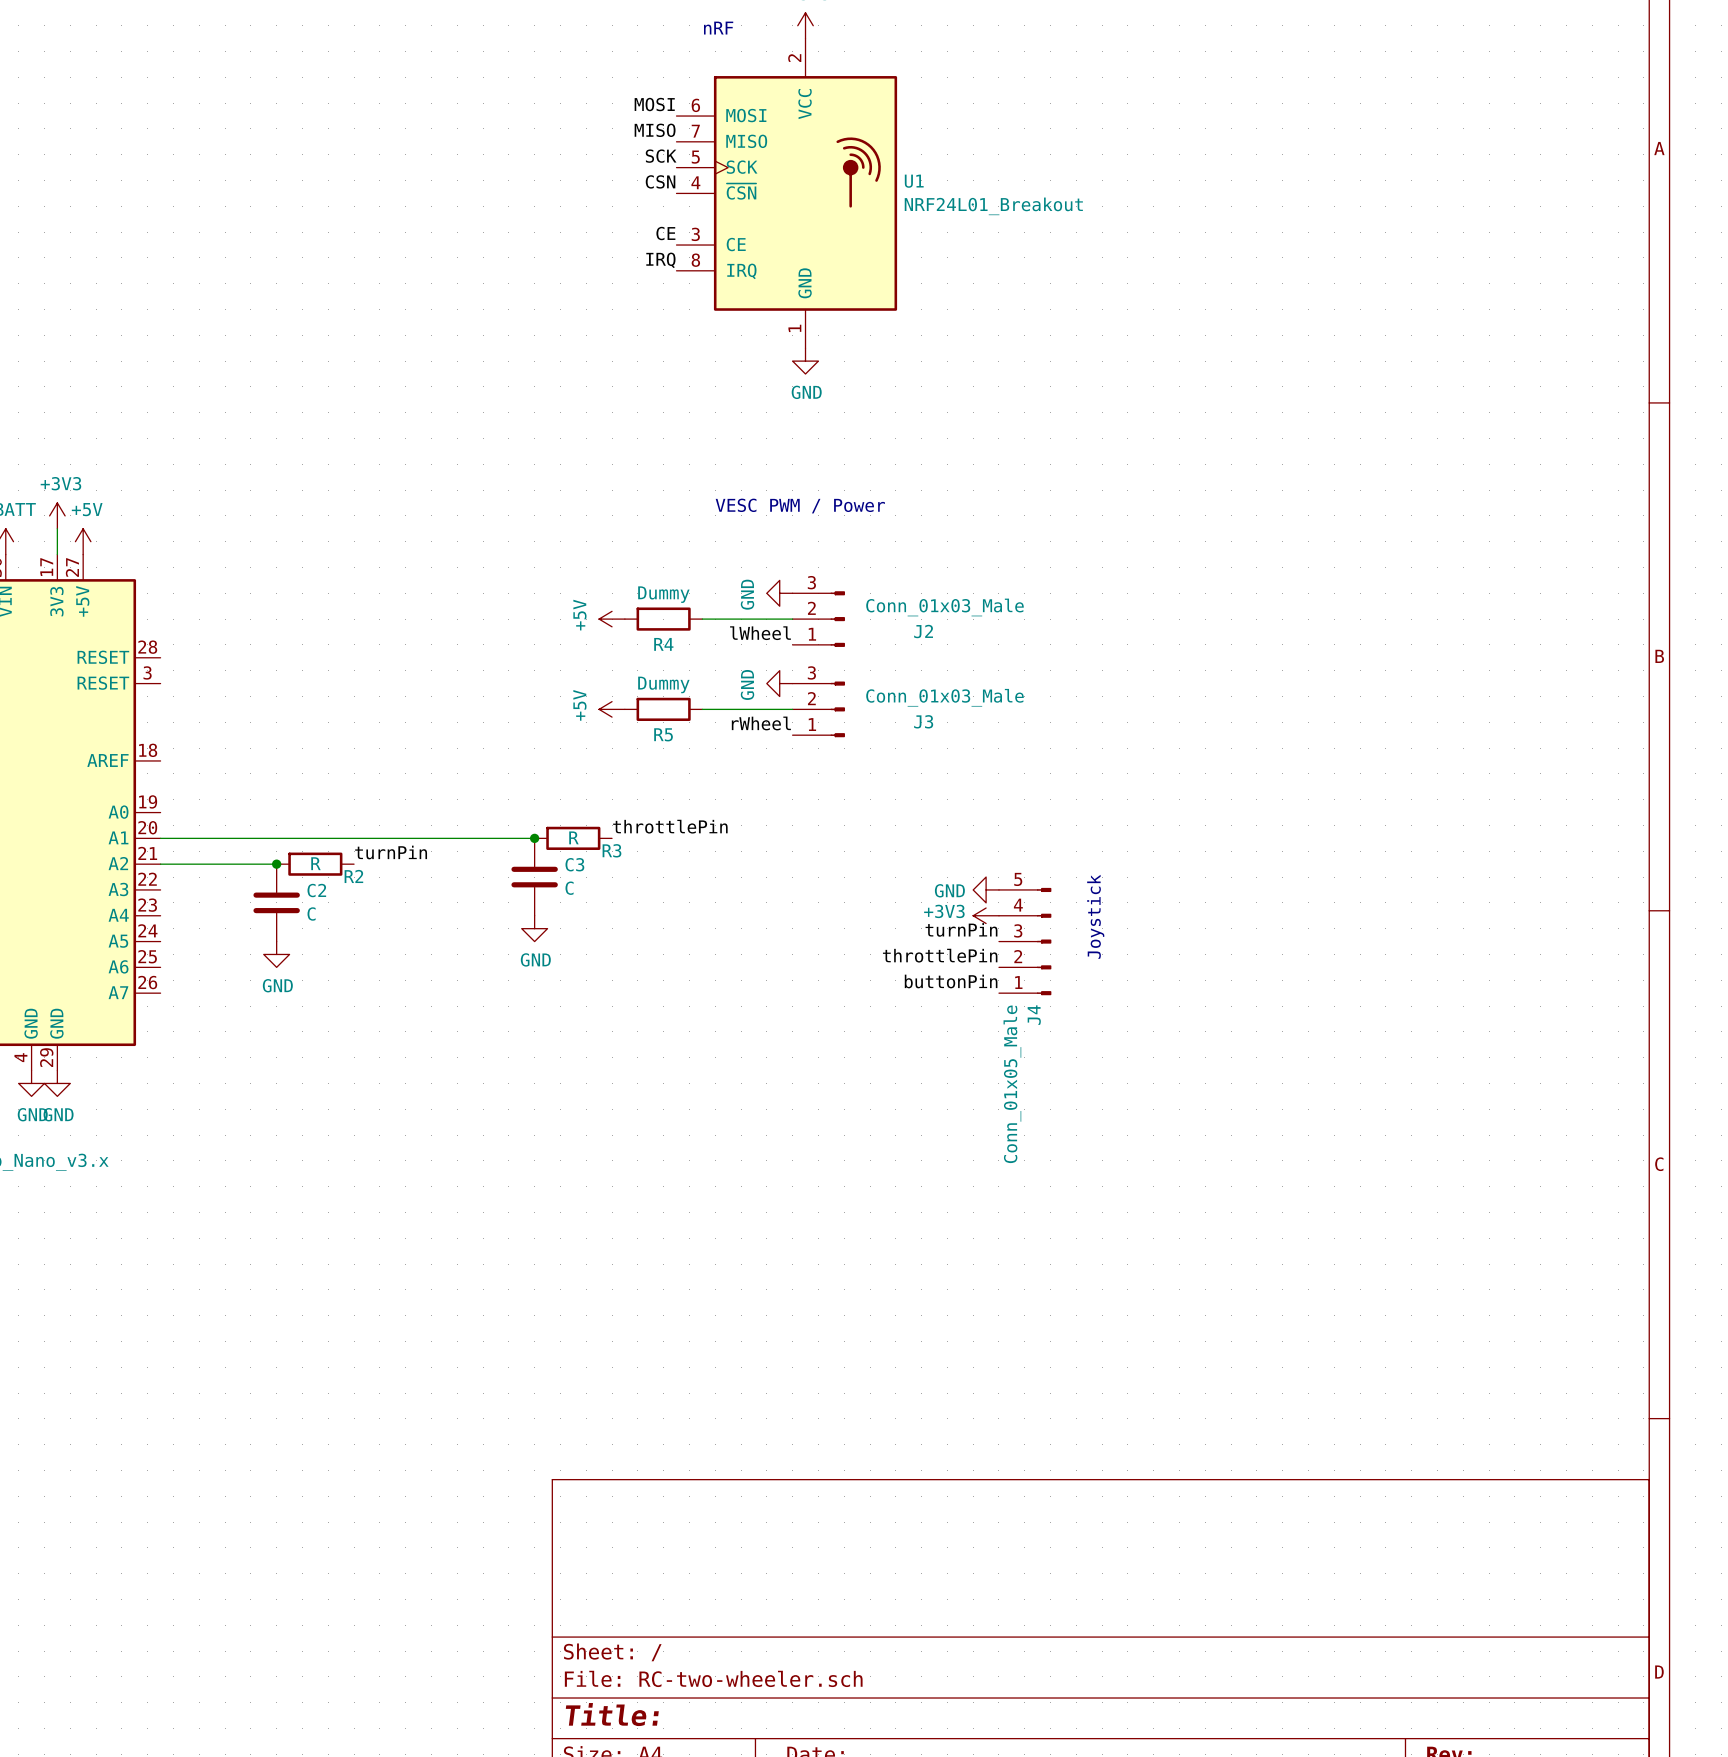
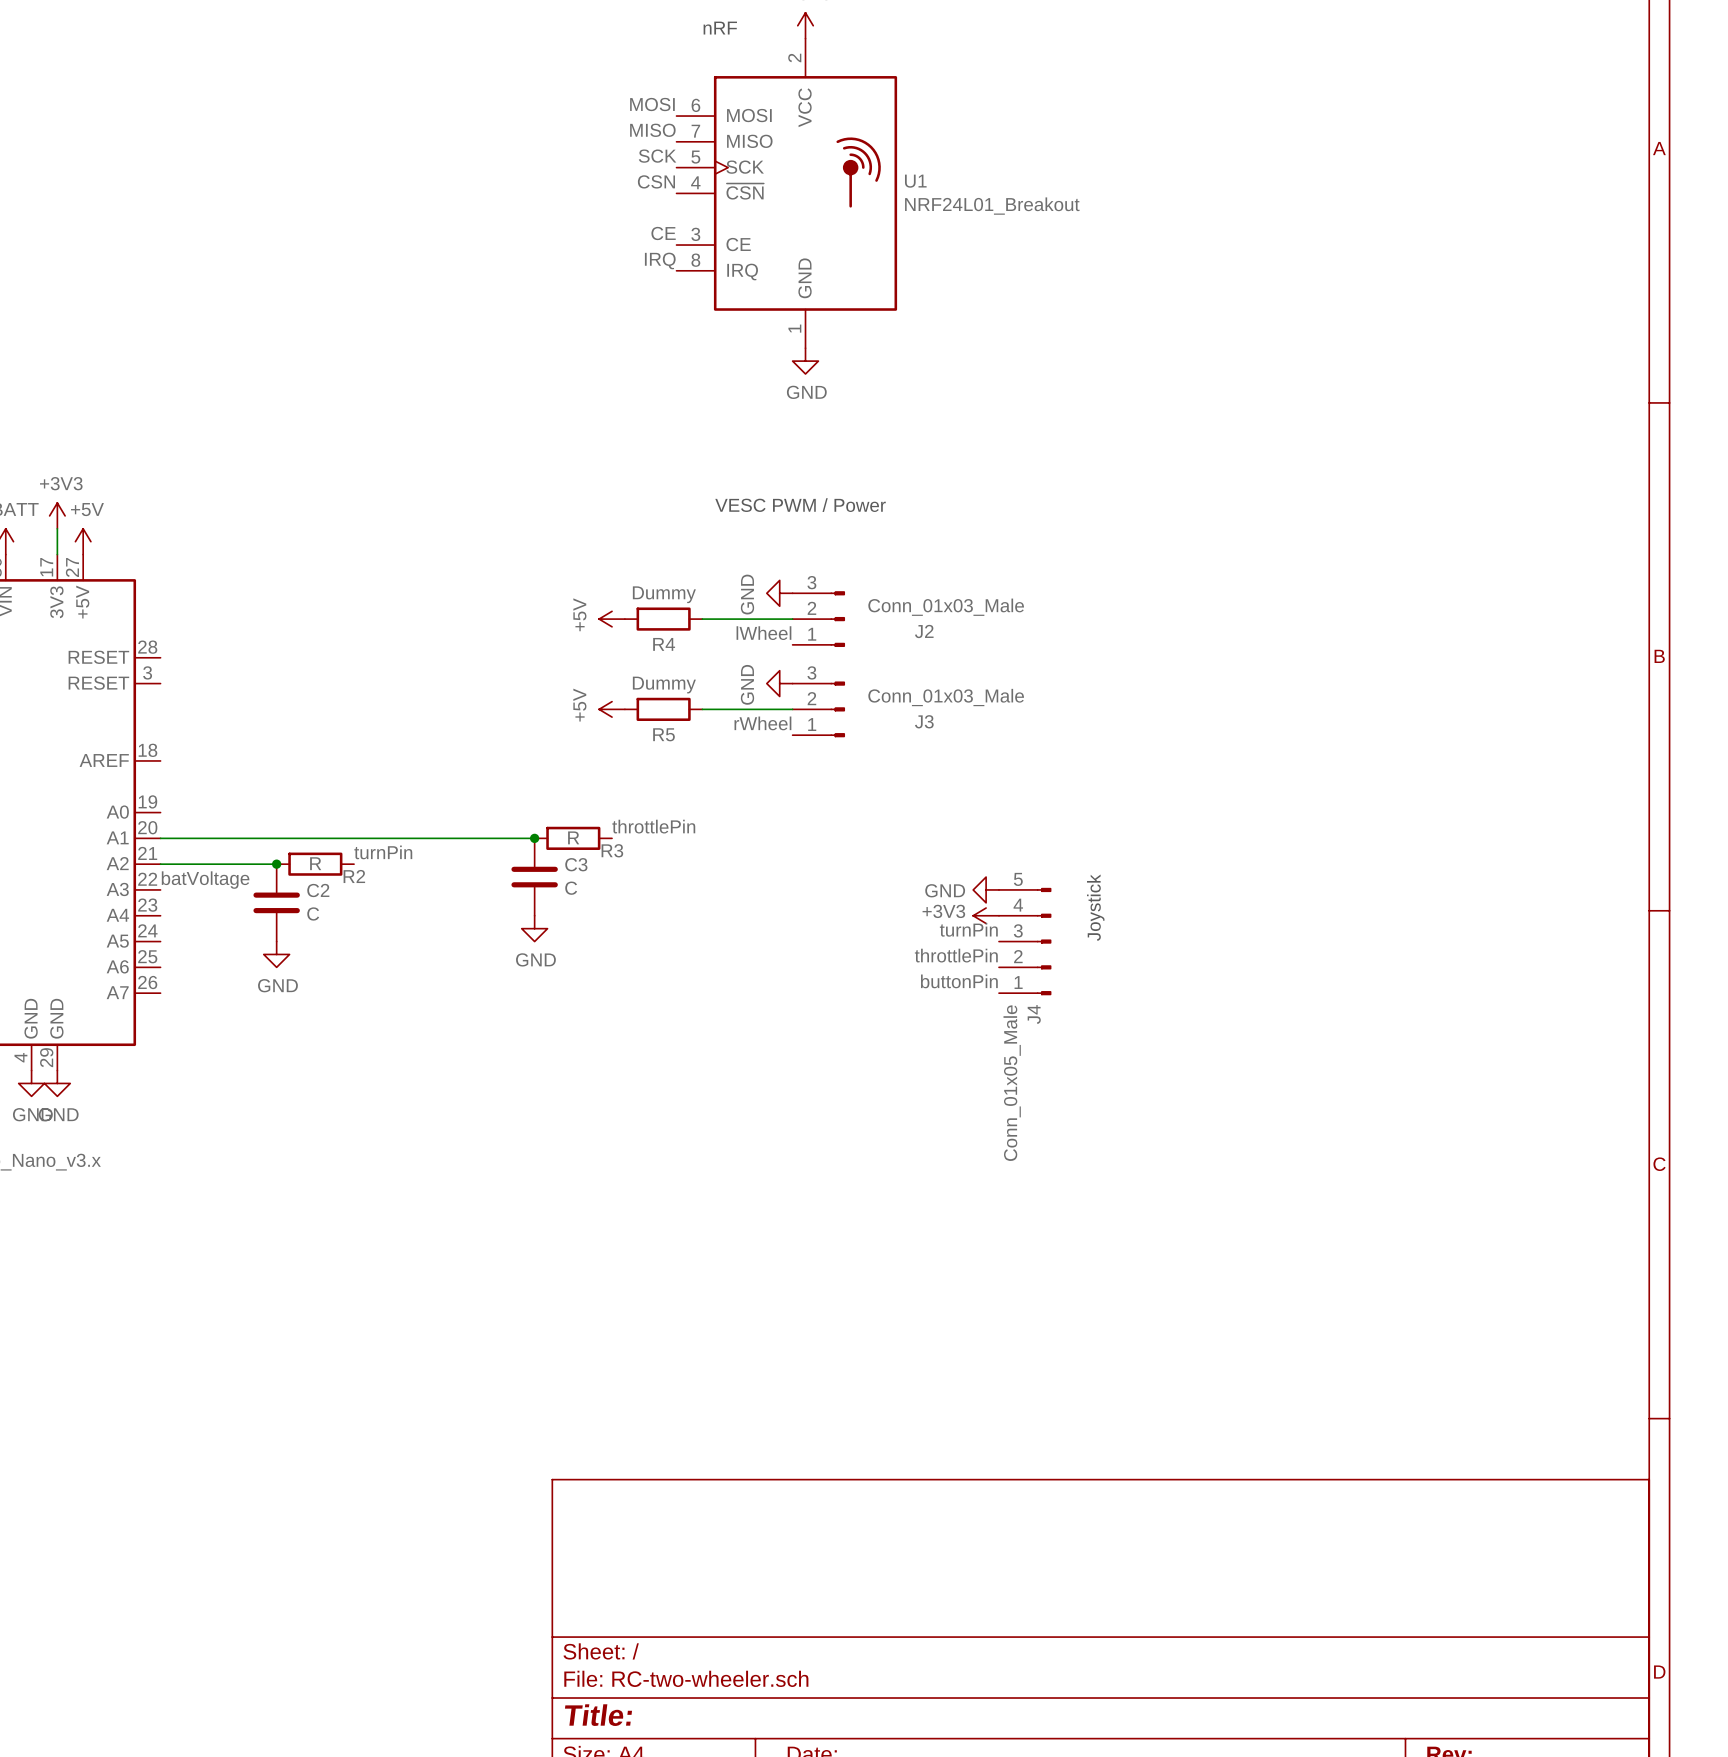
label: none -> batVoltage (205, 880)

